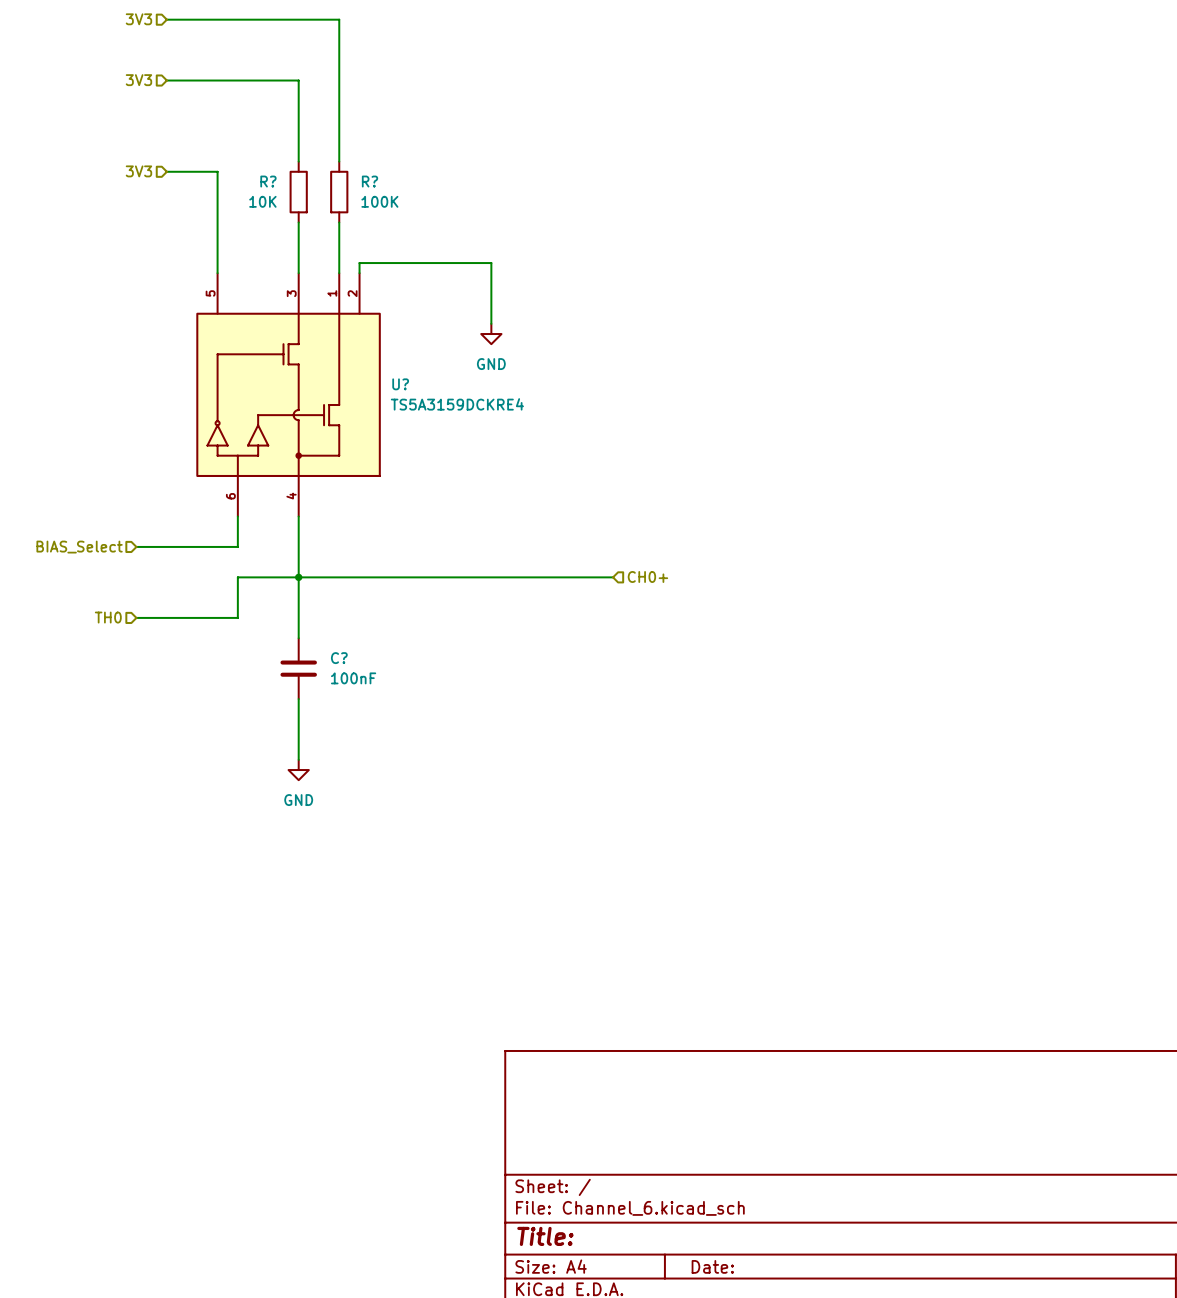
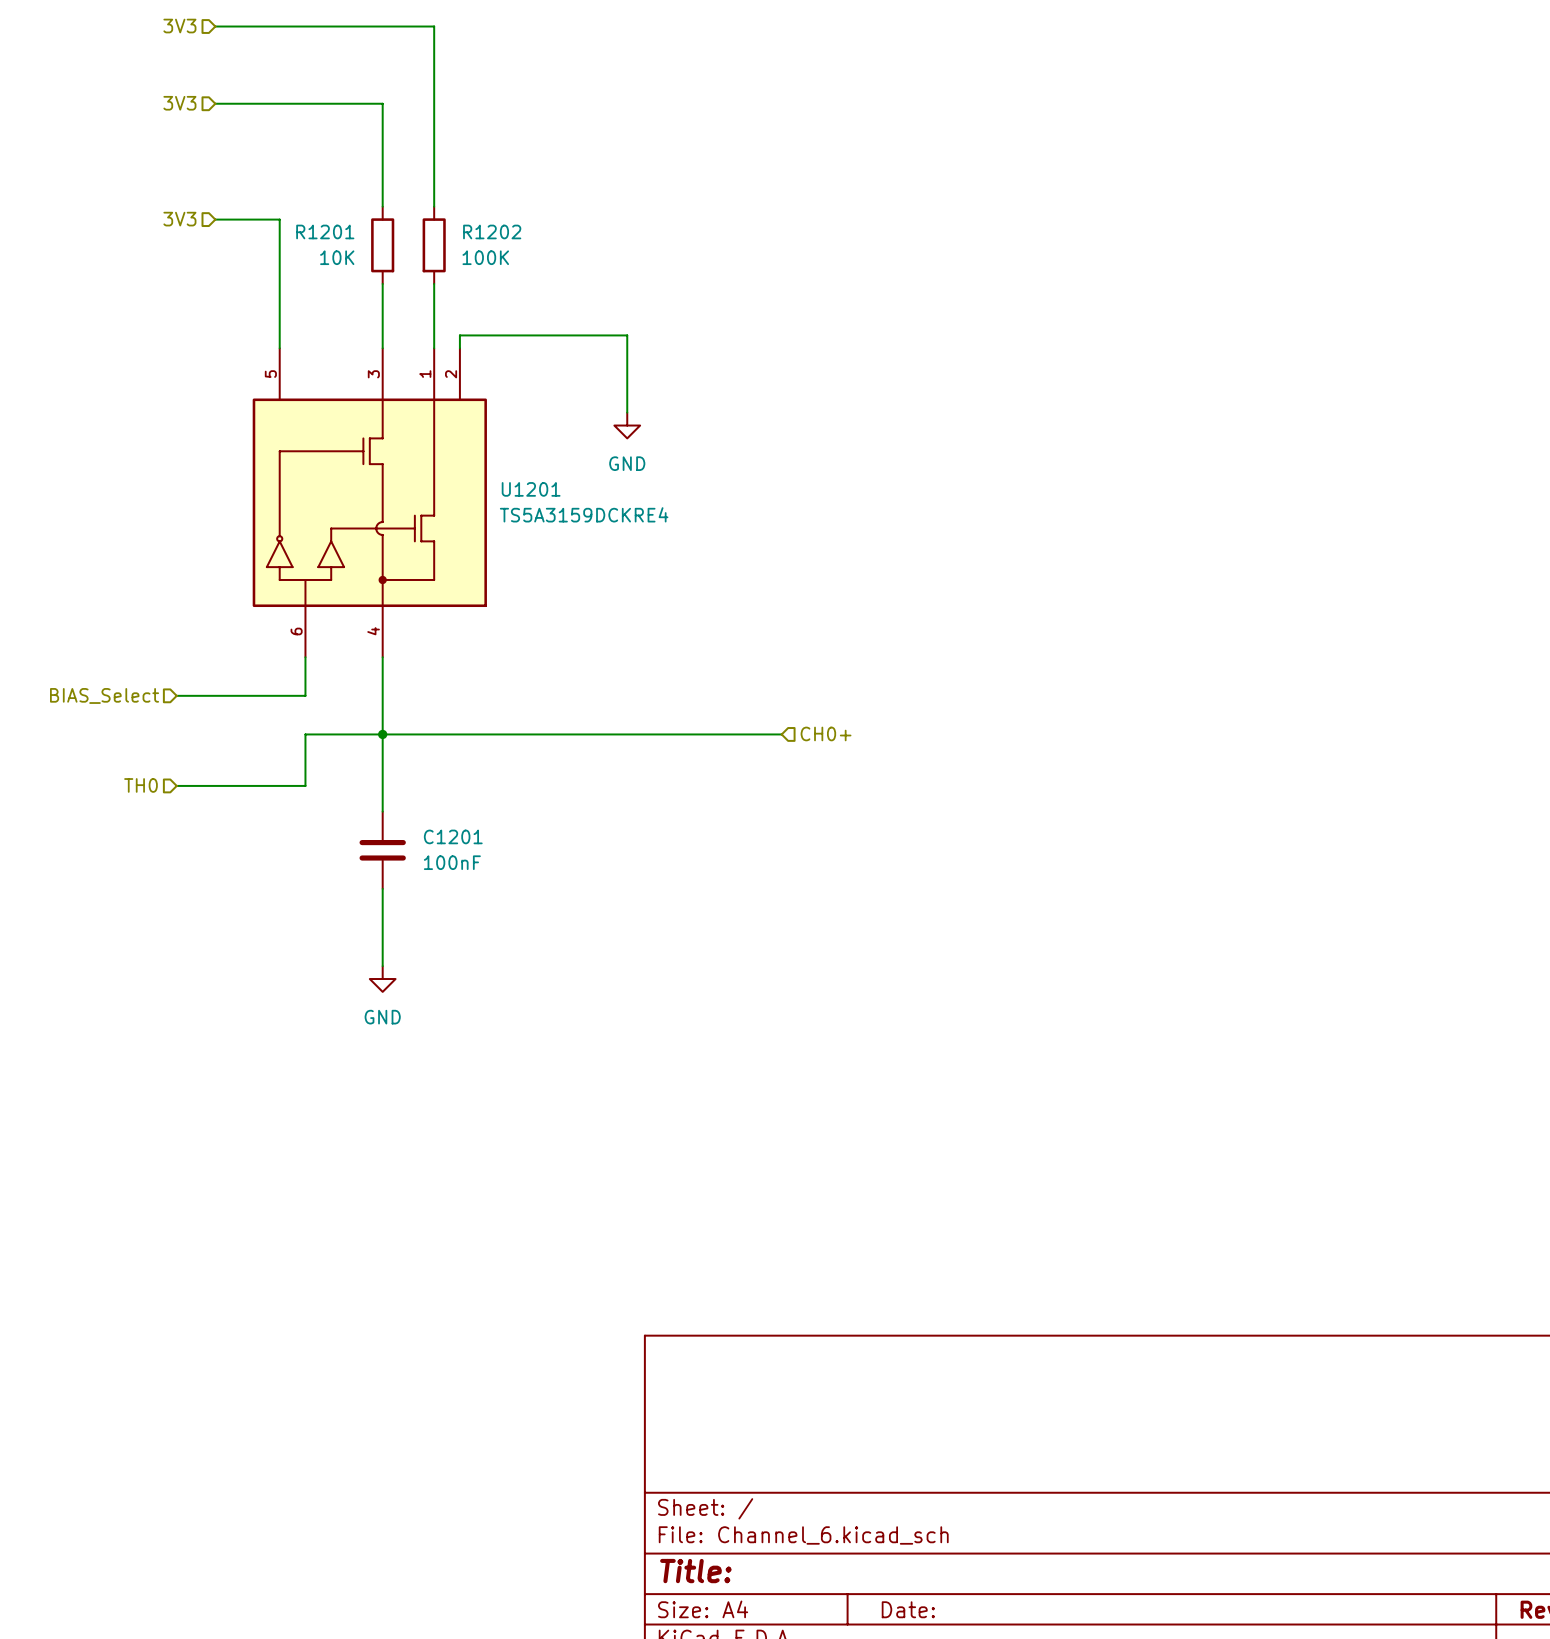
R? name: R? (268, 181) -> R1201 (325, 231)
R? name: R? (369, 181) -> R1202 (492, 231)
U? name: U? (400, 384) -> U1201 (531, 489)
C? name: C? (339, 658) -> C1201 (453, 836)

